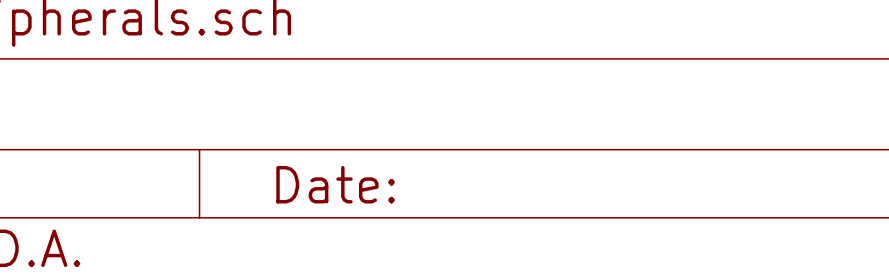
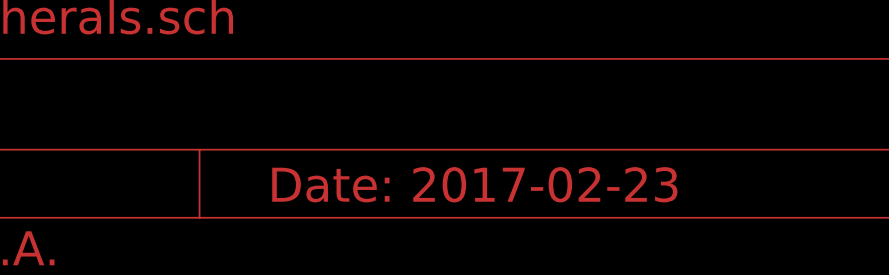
title block: Date: (335, 184) -> Date: 2017-02-23 (474, 184)

